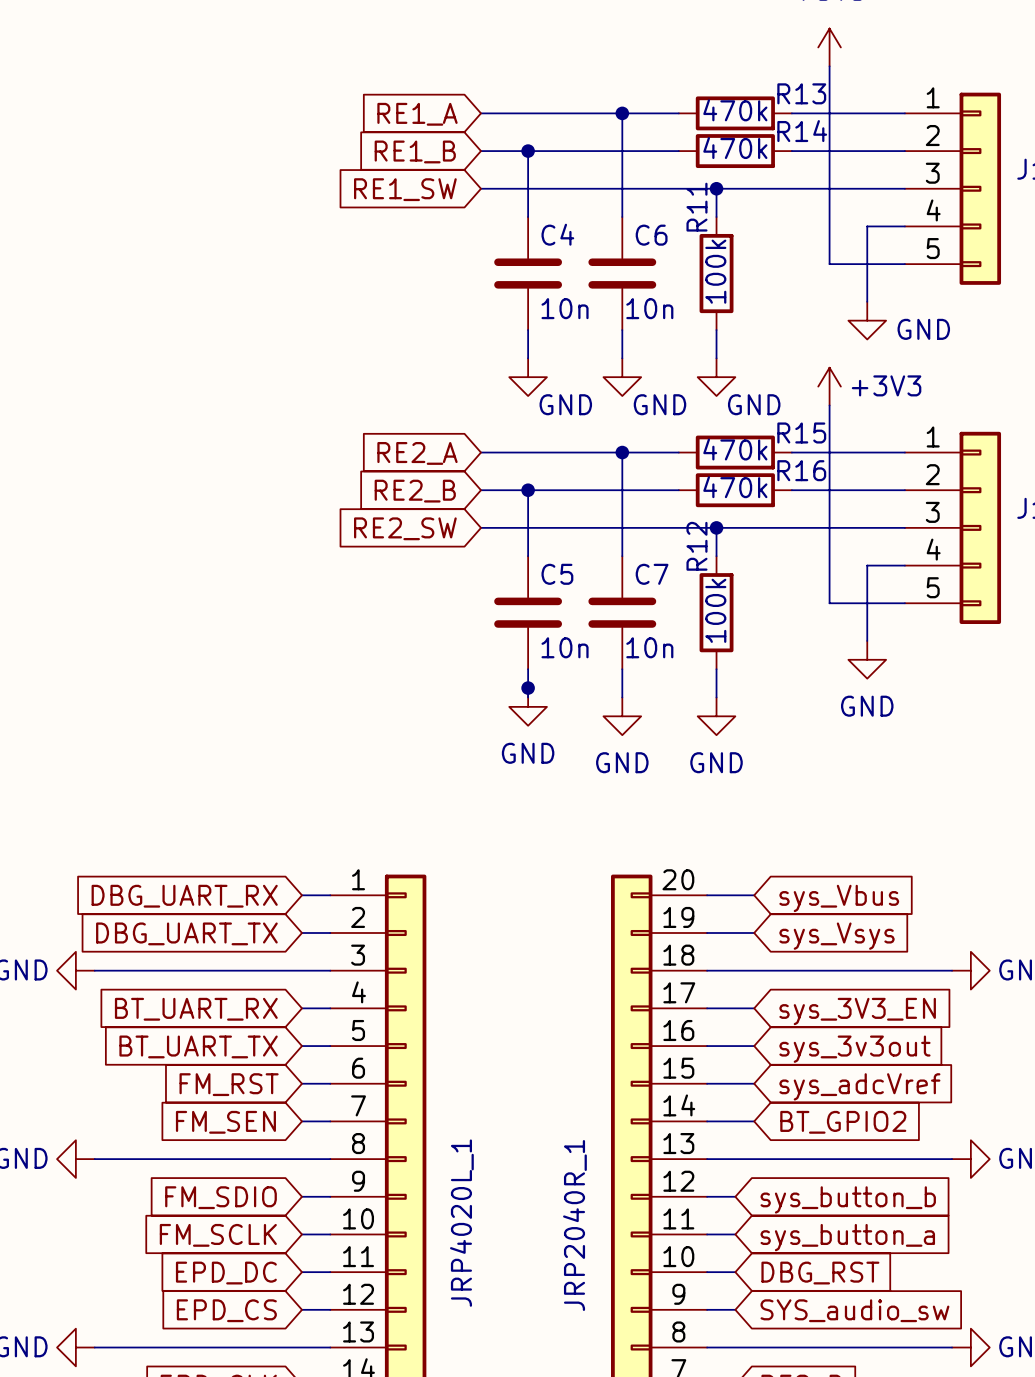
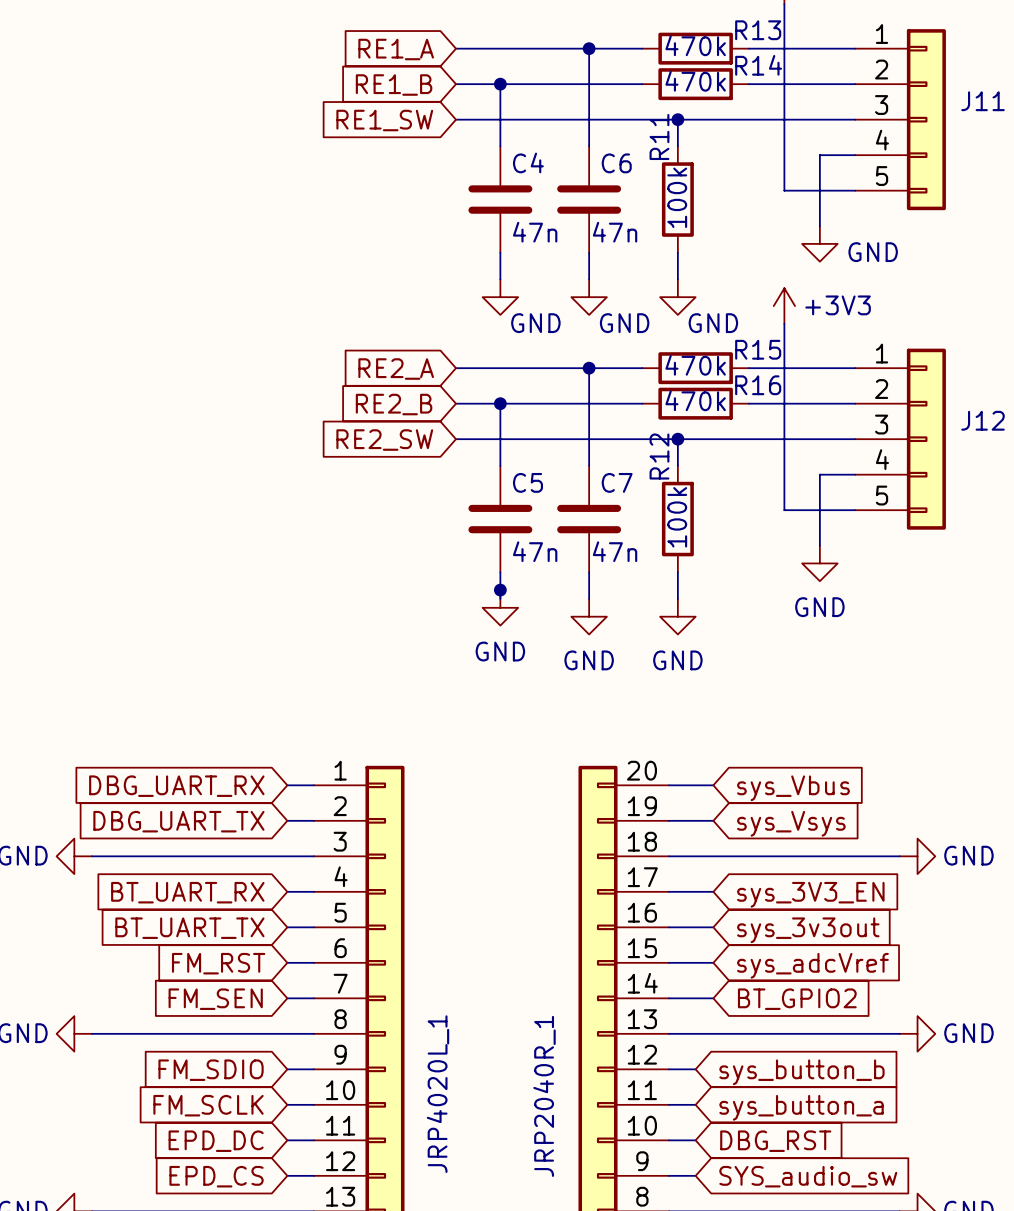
C4 value: 10n (565, 308) -> 47n (535, 232)
C6 value: 10n (649, 308) -> 47n (615, 232)
C5 value: 10n (565, 647) -> 47n (535, 551)
C7 value: 10n (649, 647) -> 47n (615, 551)

